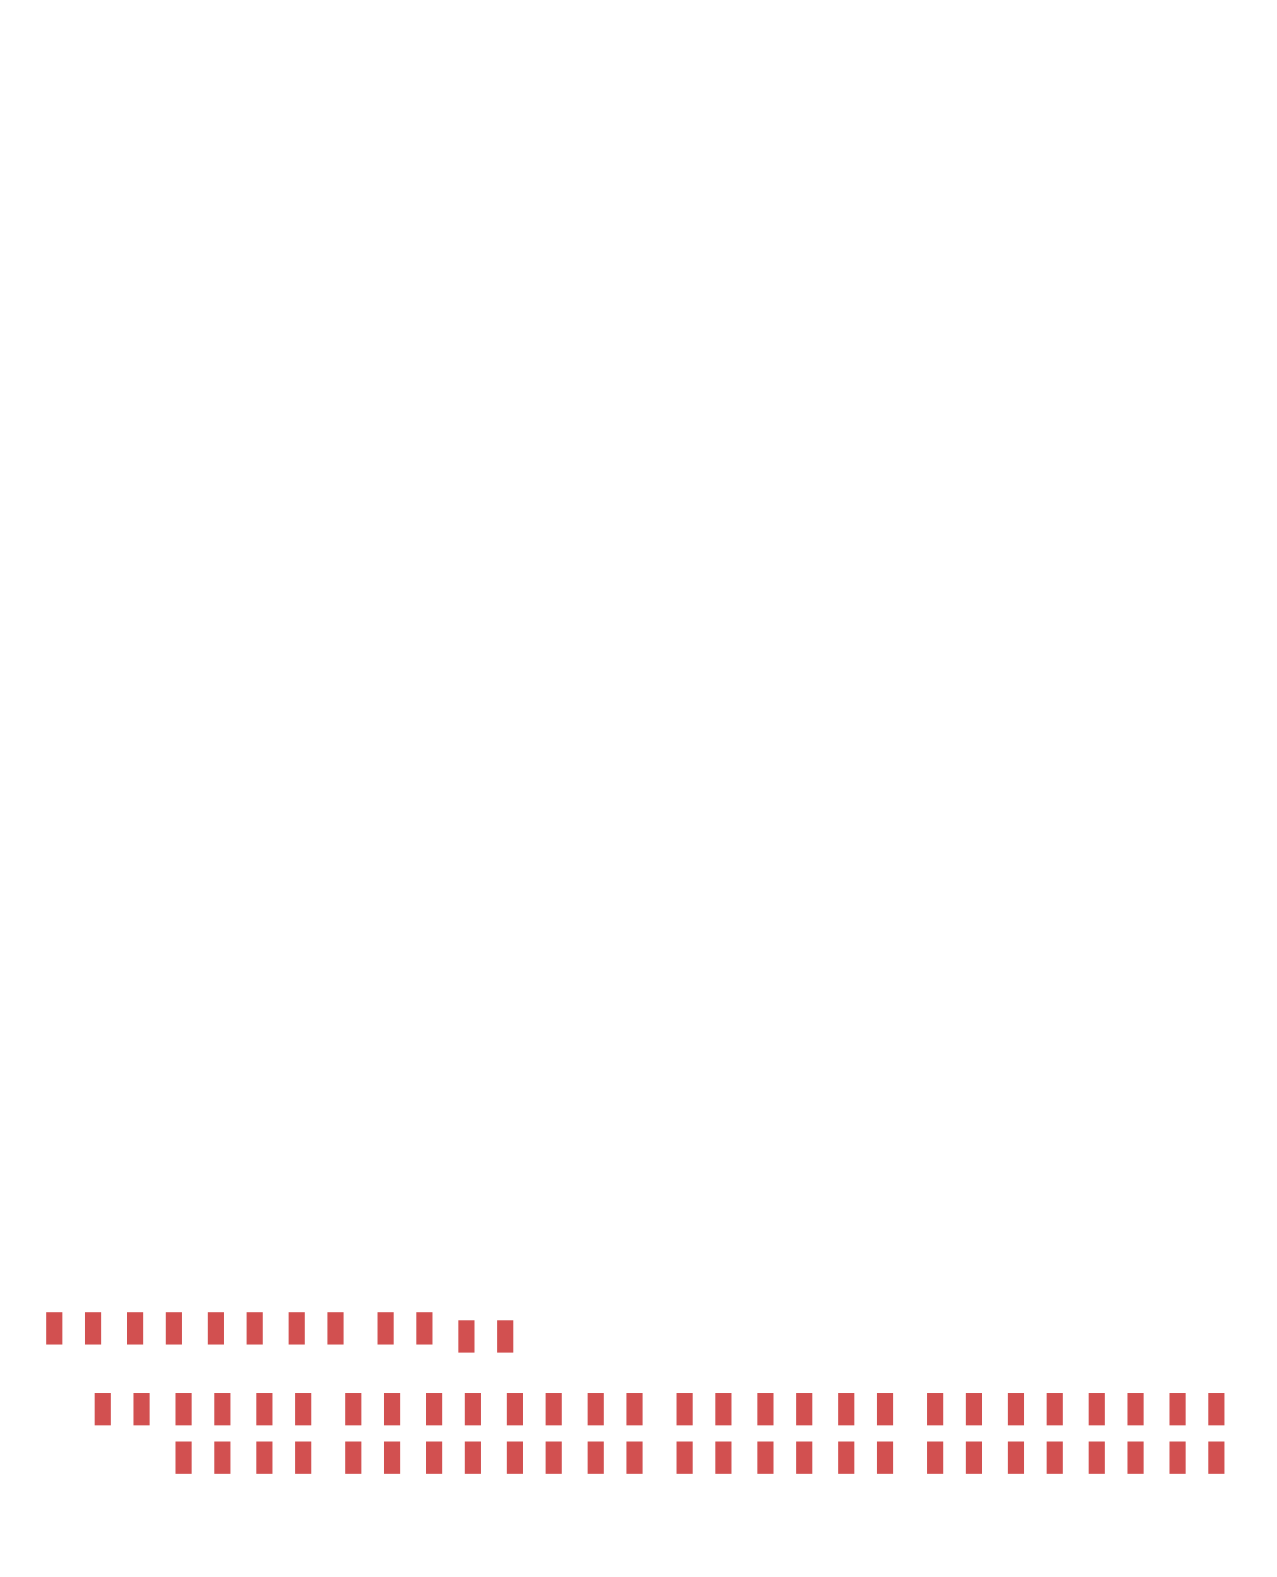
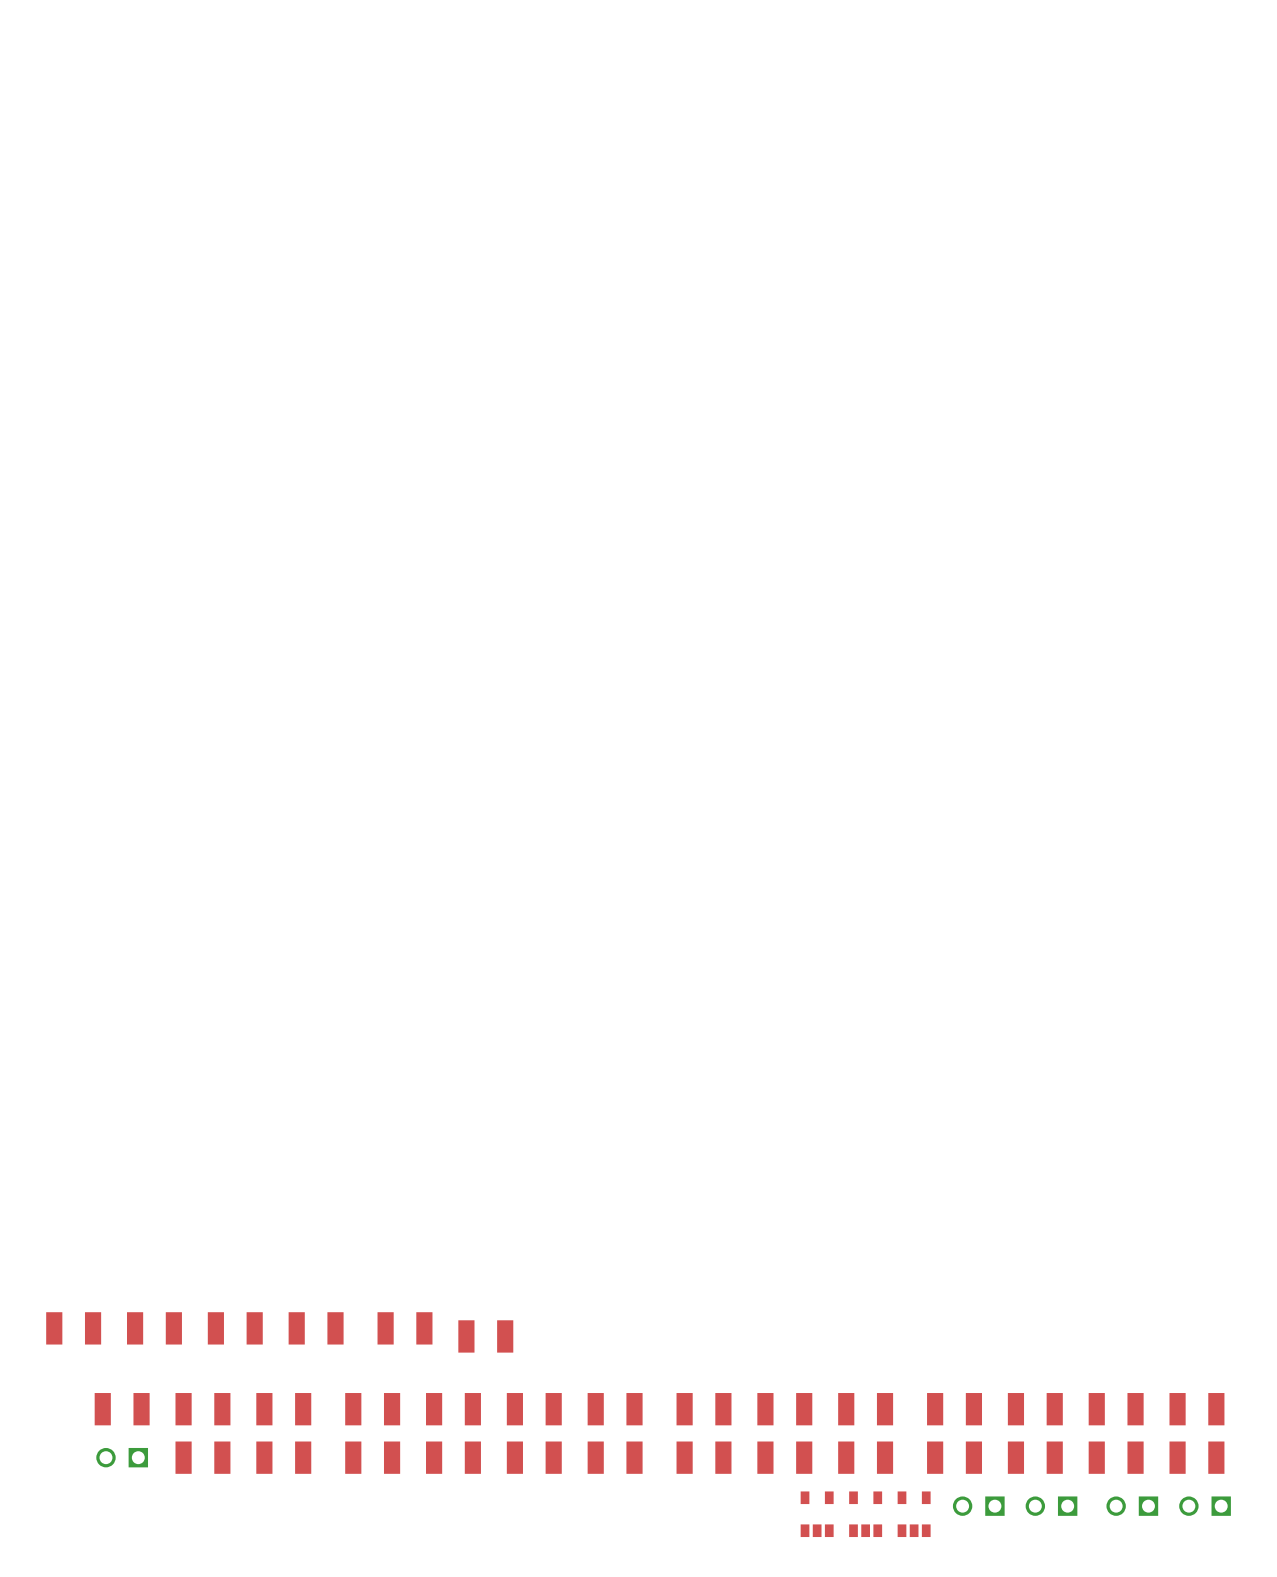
part: none -> (122, 1457)
part: none -> (978, 1506)
part: none -> (1051, 1506)
part: none -> (1132, 1506)
part: none -> (1205, 1506)
part: none -> (817, 1514)
part: none -> (865, 1514)
part: none -> (914, 1514)

